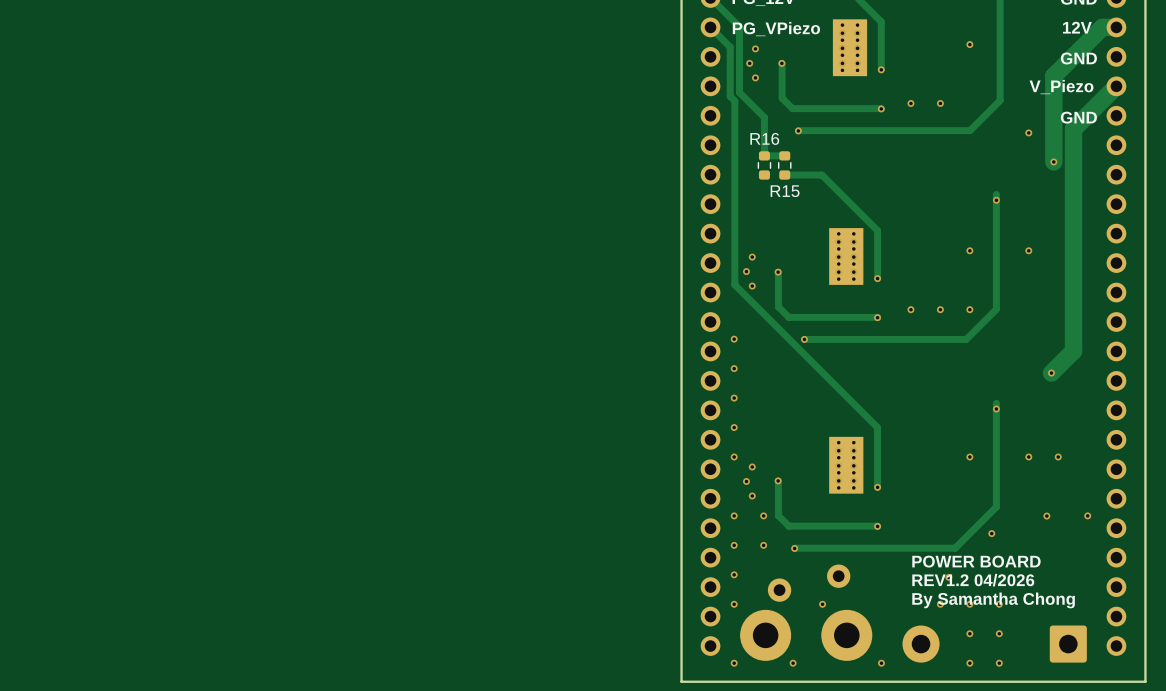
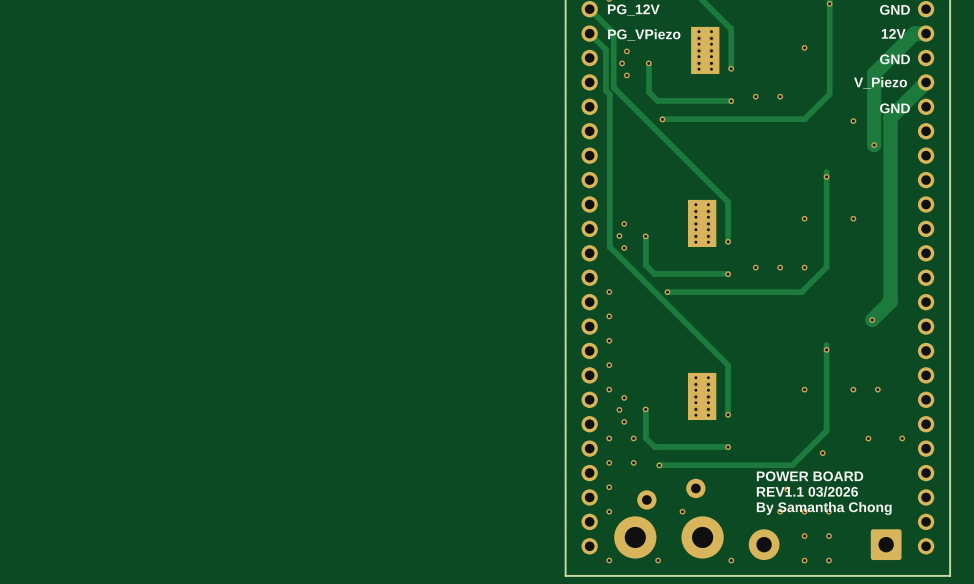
track: (764, 117) (764, 155) (784, 155) -> (634, 108) (681, 155)
R16: (764, 165) -> none
R15: (784, 165) -> none
track: (821, 175) (784, 175) -> none
text: REV1.2 04/2026 (973, 580) -> REV1.1 03/2026 (807, 491)

